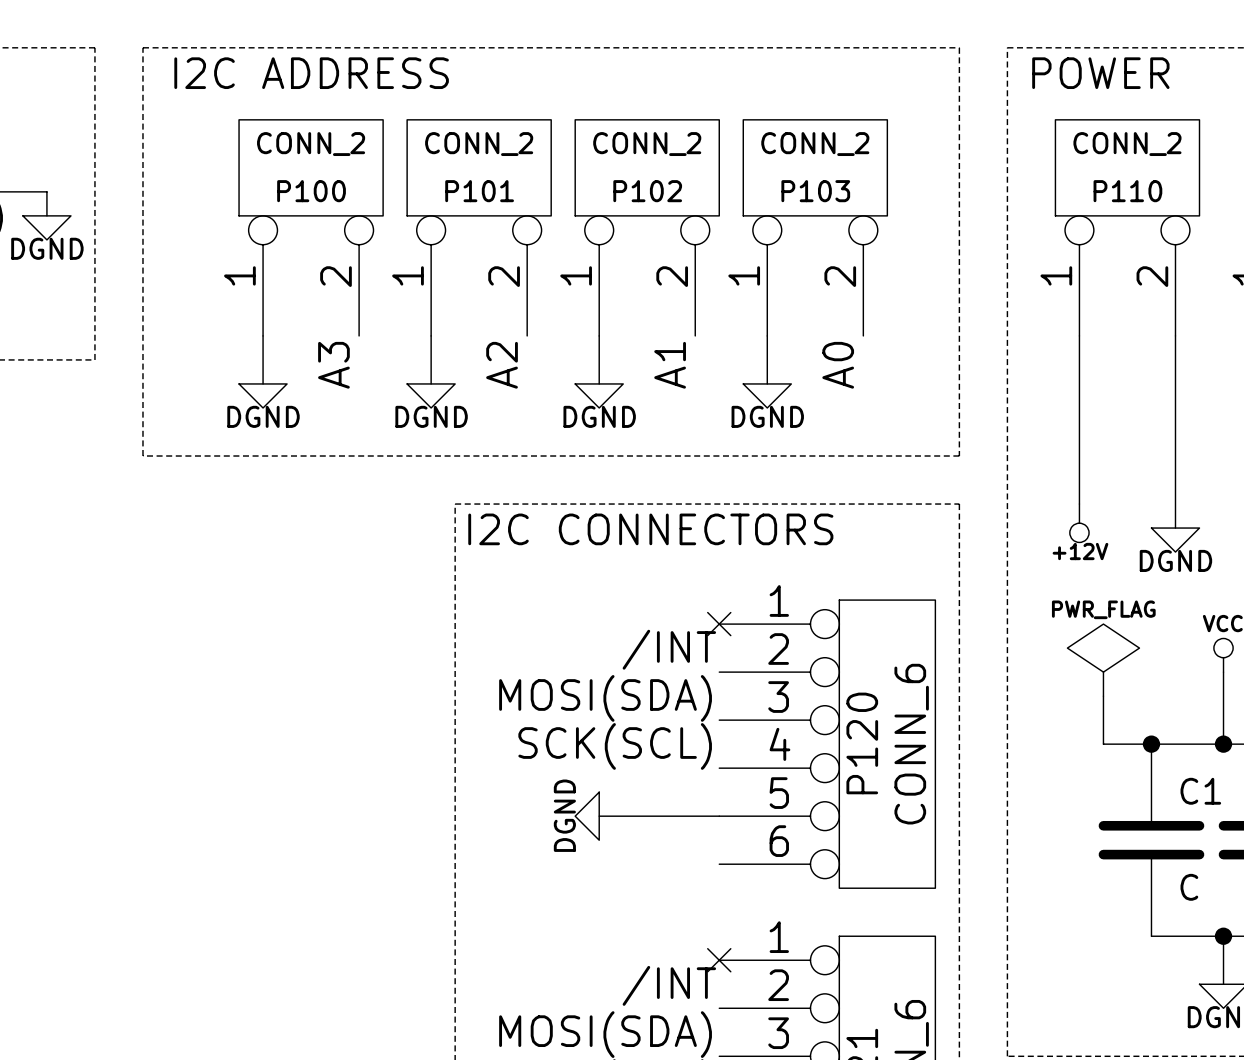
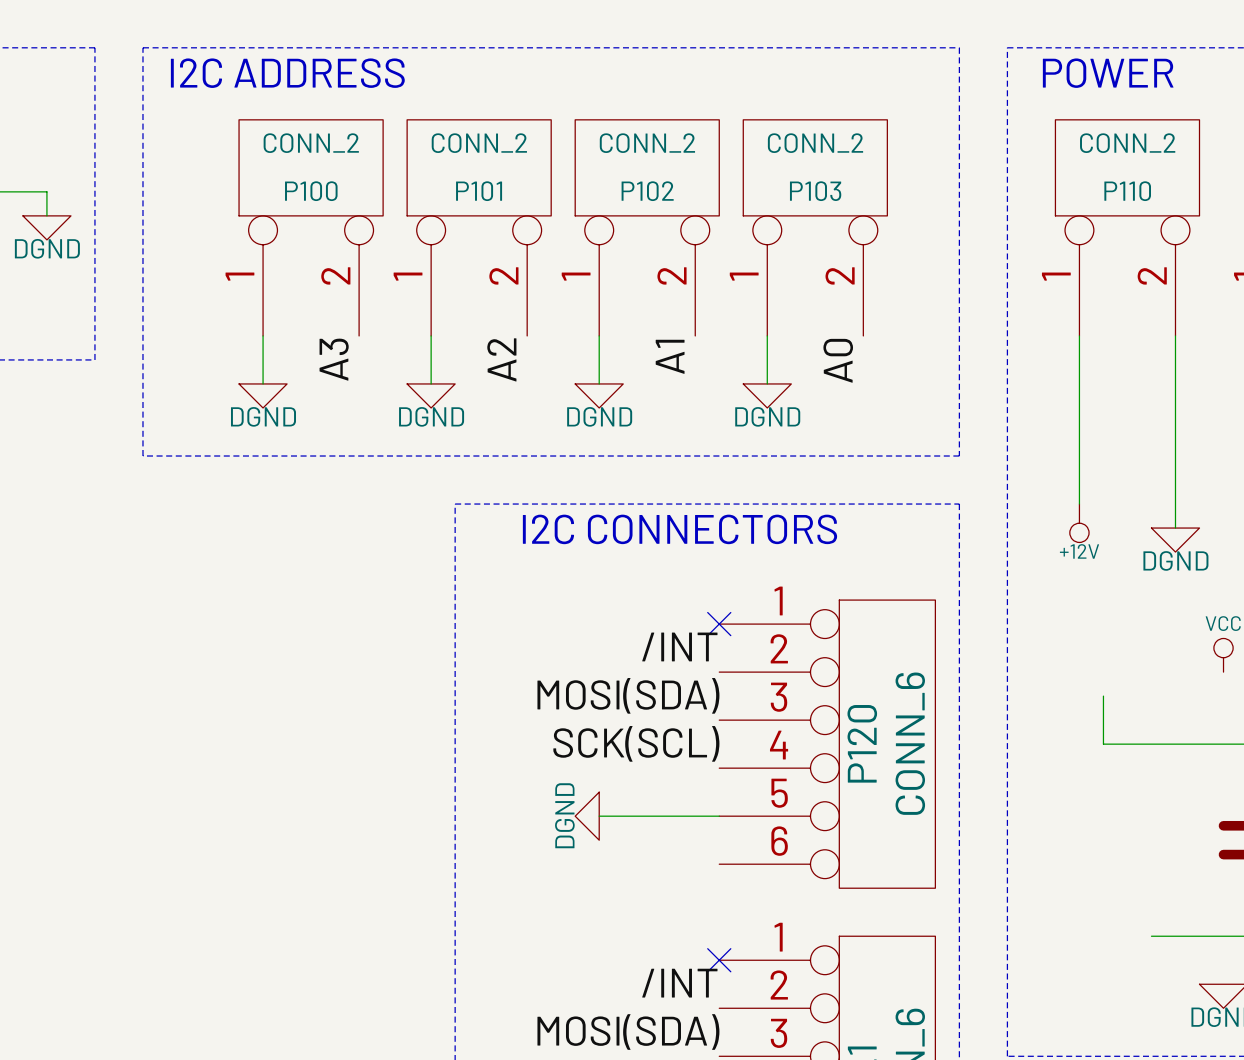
power symbol: PWR_FLAG (1103, 660) -> none
wire: (1223, 672) (1223, 744) -> none
junction: (1151, 744) -> none
junction: (1223, 744) -> none
C1: C (1151, 840) -> none
wire: (1223, 936) (1223, 984) -> none
junction: (1223, 936) -> none

